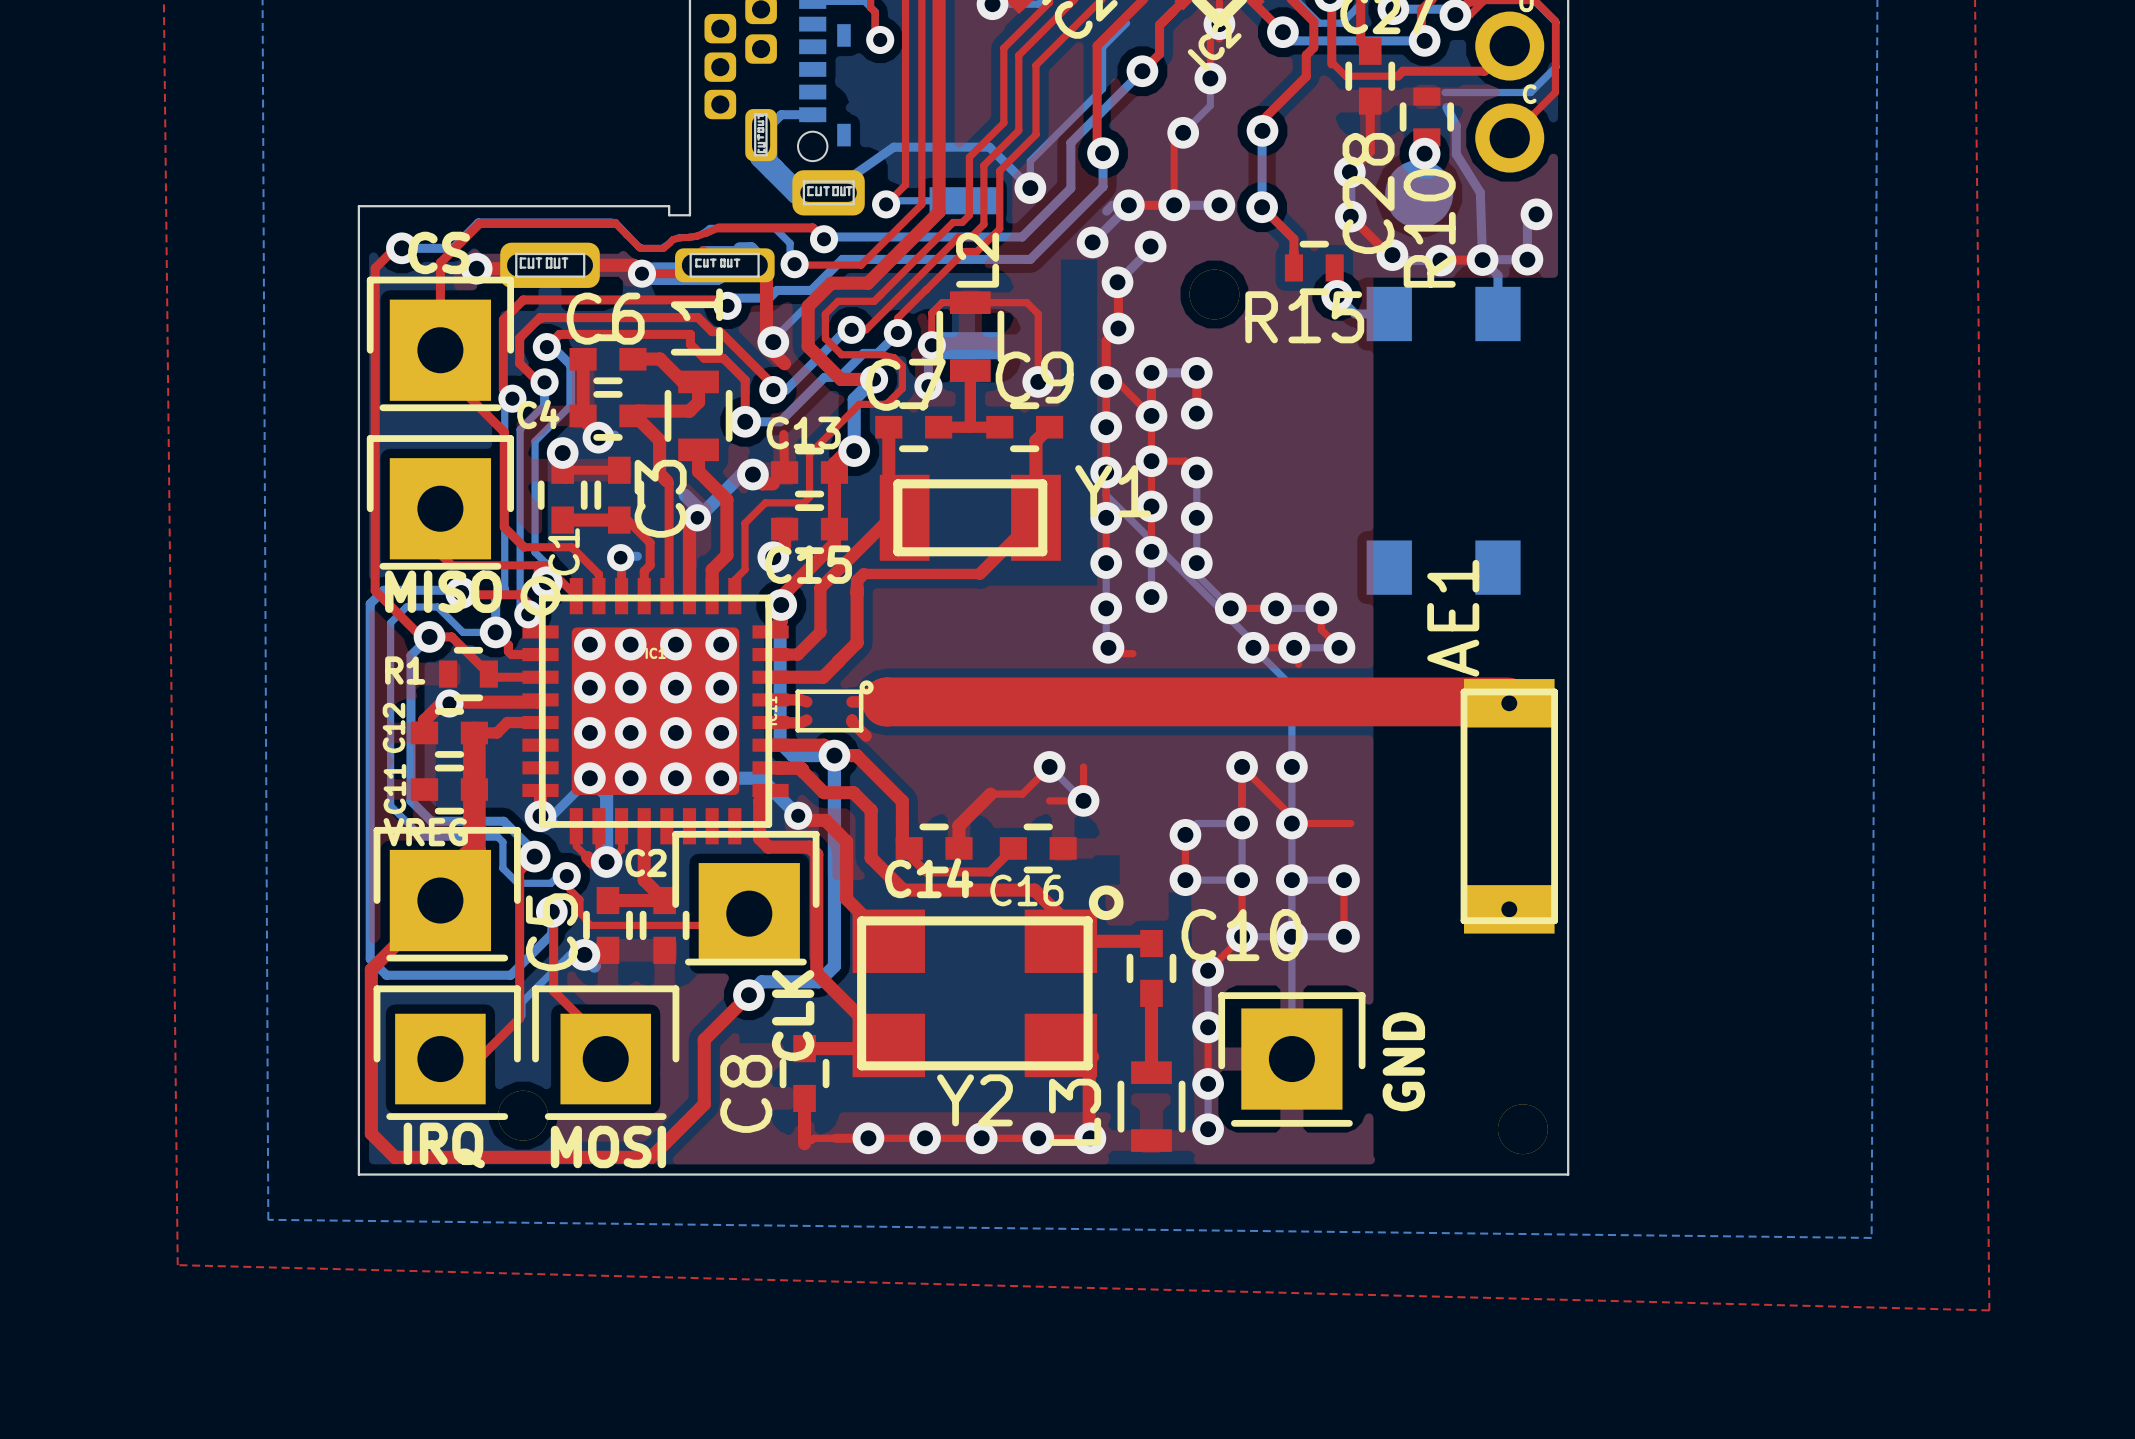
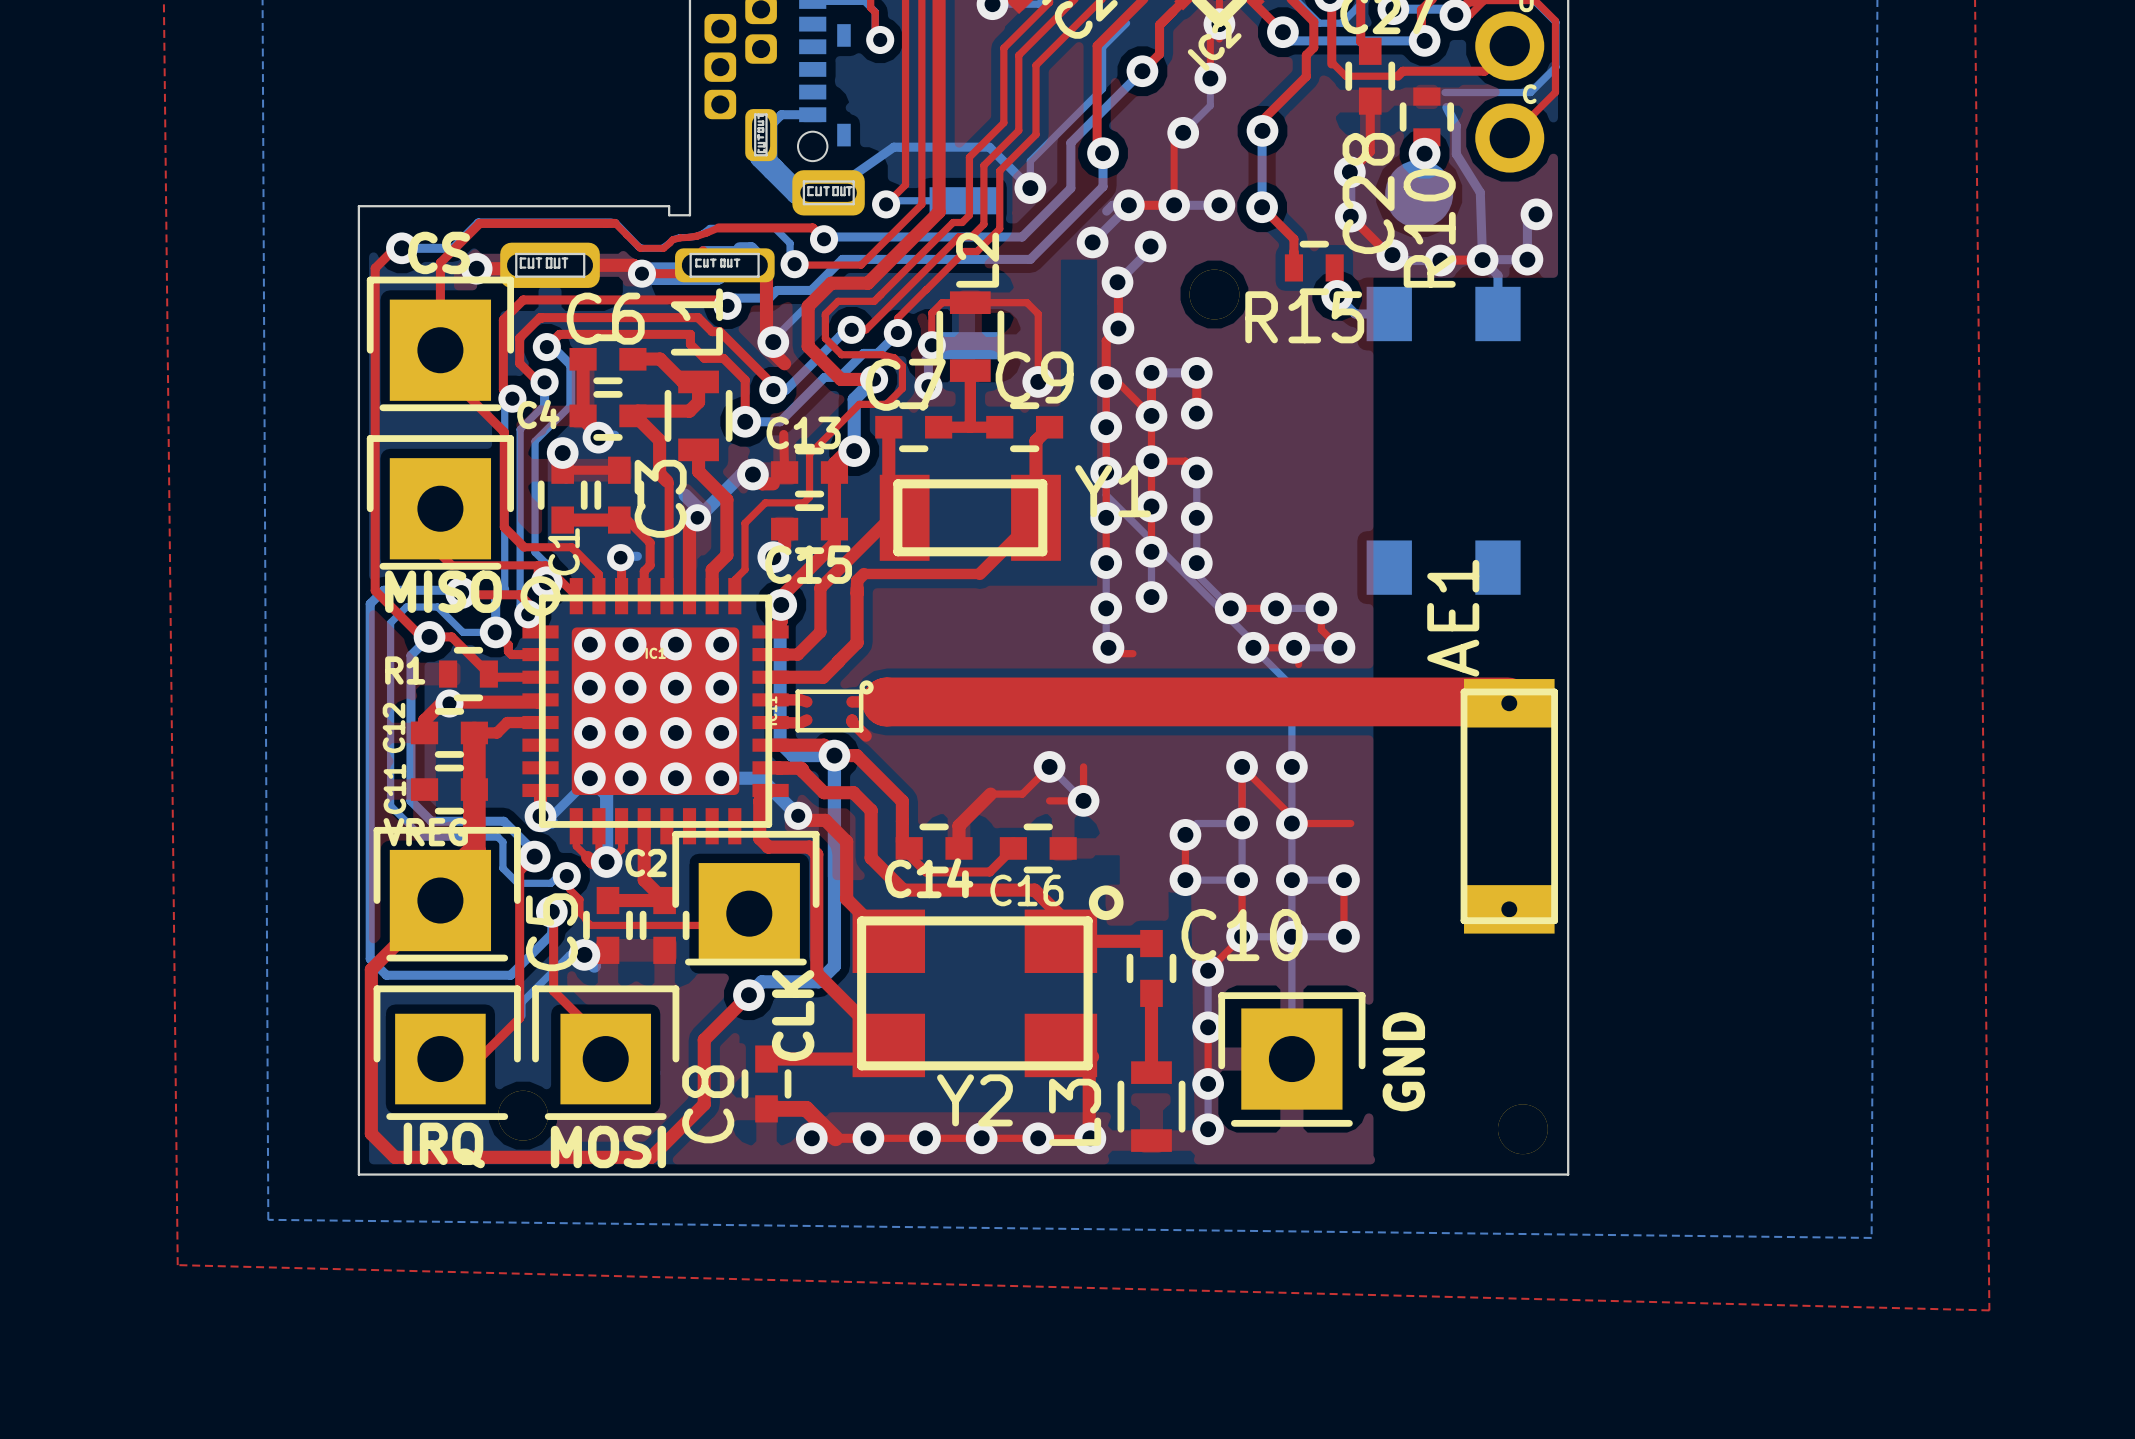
top track: (804, 1048) (885, 1048) -> none
top track: none -> (766, 1059) (875, 1059)
C8 position: (804, 1073) -> (766, 1083)
top track: (804, 1098) (804, 1143) -> none
top track: none -> (766, 1108) (806, 1108) (835, 1138)
via: none -> (811, 1138)

